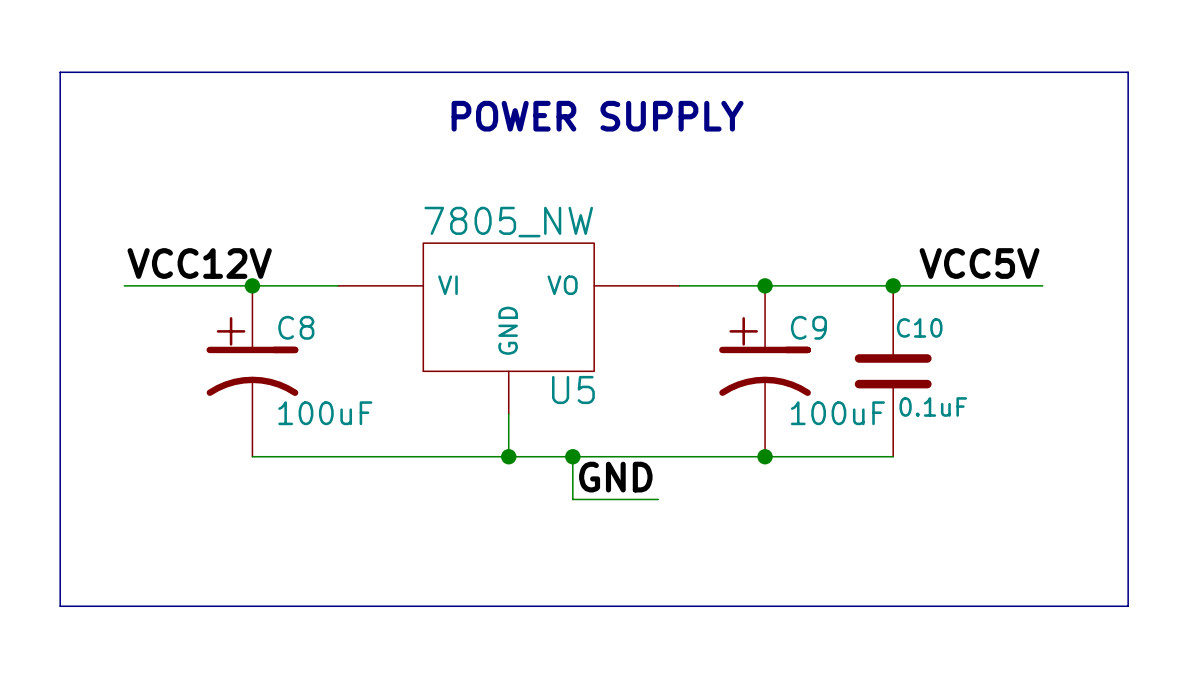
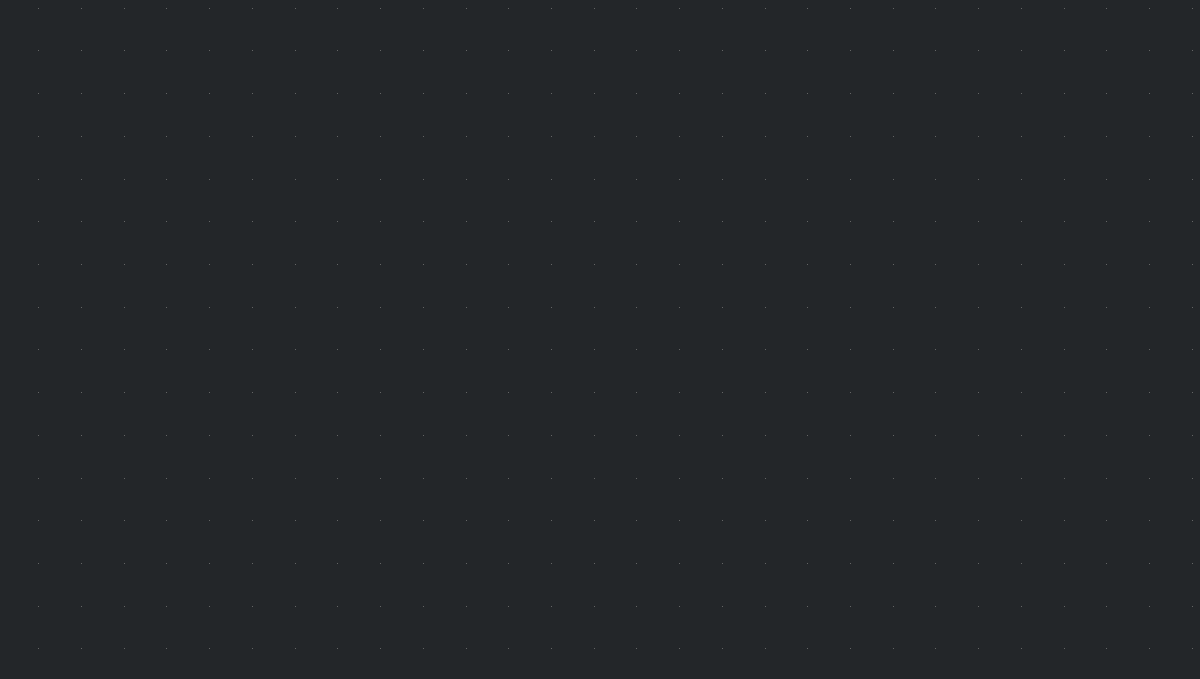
bus: (60, 72) (60, 606) (1128, 606) (1128, 72) (60, 72) -> none
text: POWER SUPPLY (597, 116) -> none
label: VCC12V (199, 263) -> none
label: VCC5V (979, 263) -> none
wire: (124, 285) (337, 285) -> none
junction: (252, 285) -> none
wire: (679, 285) (1042, 285) -> none
junction: (765, 285) -> none
junction: (893, 285) -> none
U5: 7805_NW (508, 328) -> none
C8: 100uF (252, 371) -> none
C9: 100uF (765, 371) -> none
C10: 0.1uF (893, 371) -> none
wire: (508, 414) (508, 456) -> none
wire: (252, 456) (893, 456) -> none
junction: (508, 456) -> none
wire: (572, 456) (572, 499) (658, 499) -> none
junction: (572, 456) -> none
junction: (765, 456) -> none
label: GND (615, 477) -> none

